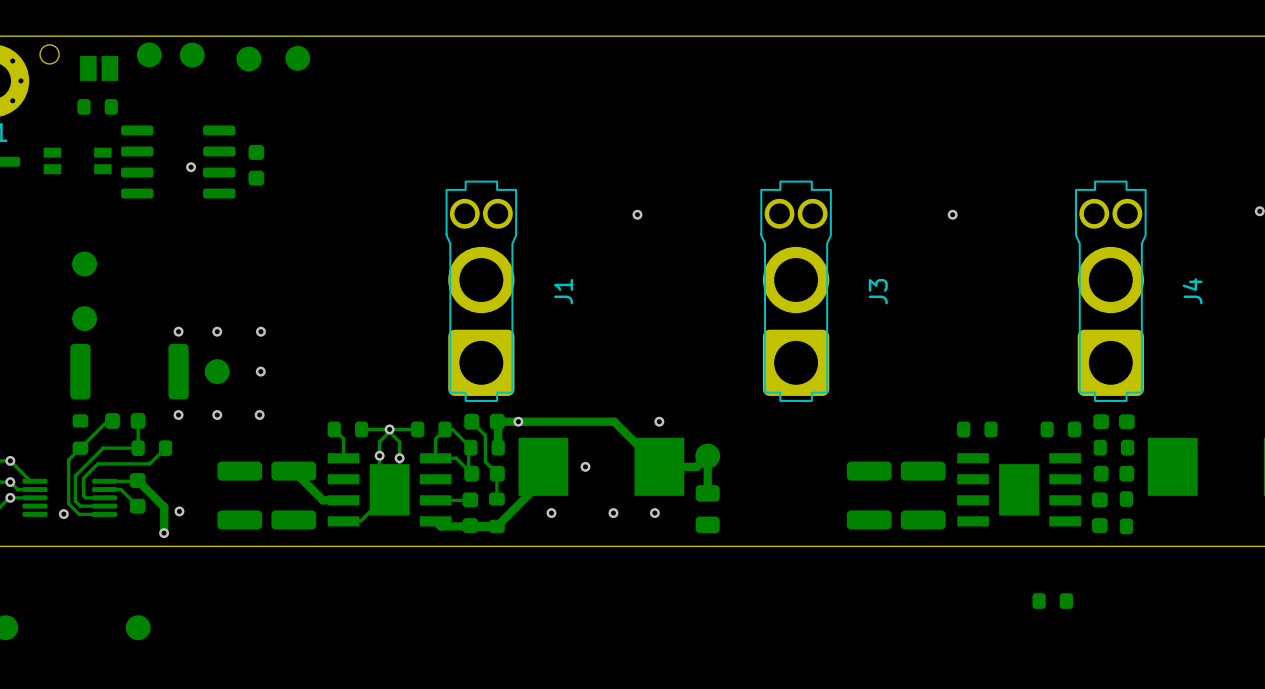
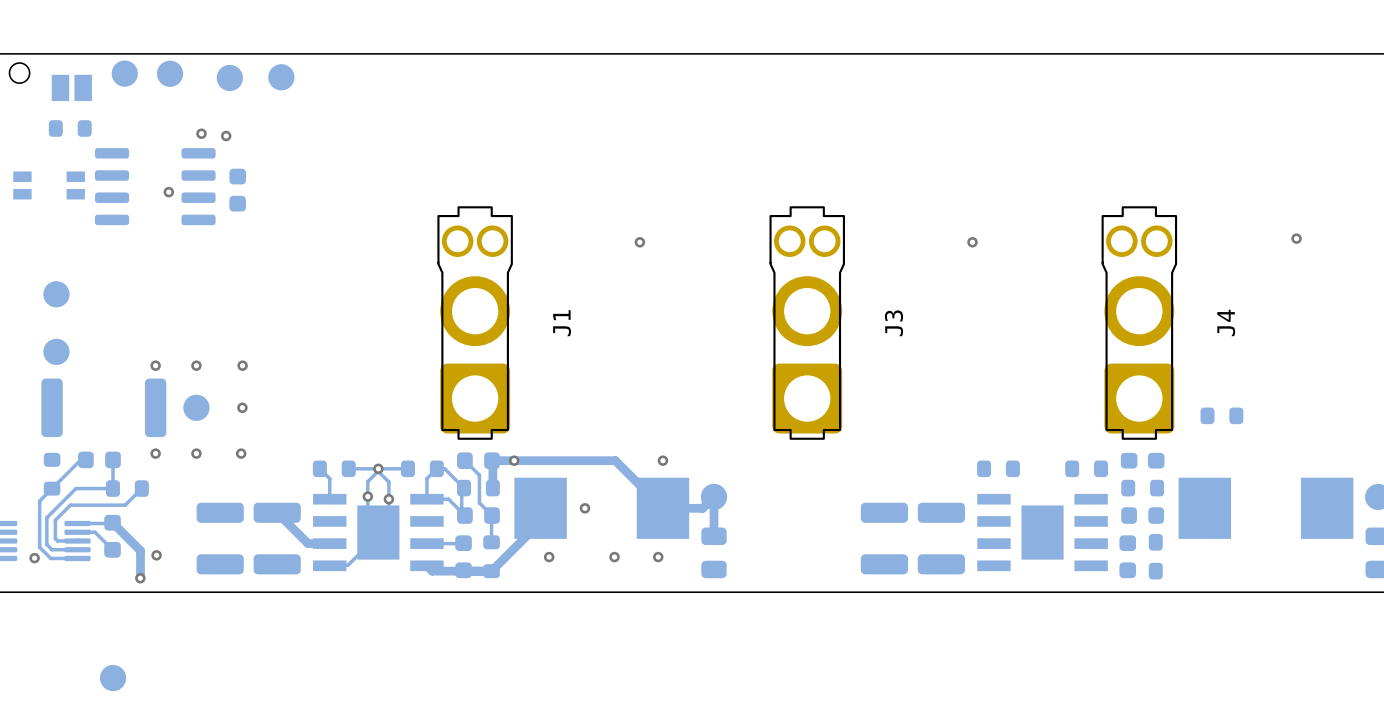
via: none -> (201, 133)
via: none -> (226, 136)
part position: (1052, 601) -> (1221, 415)

